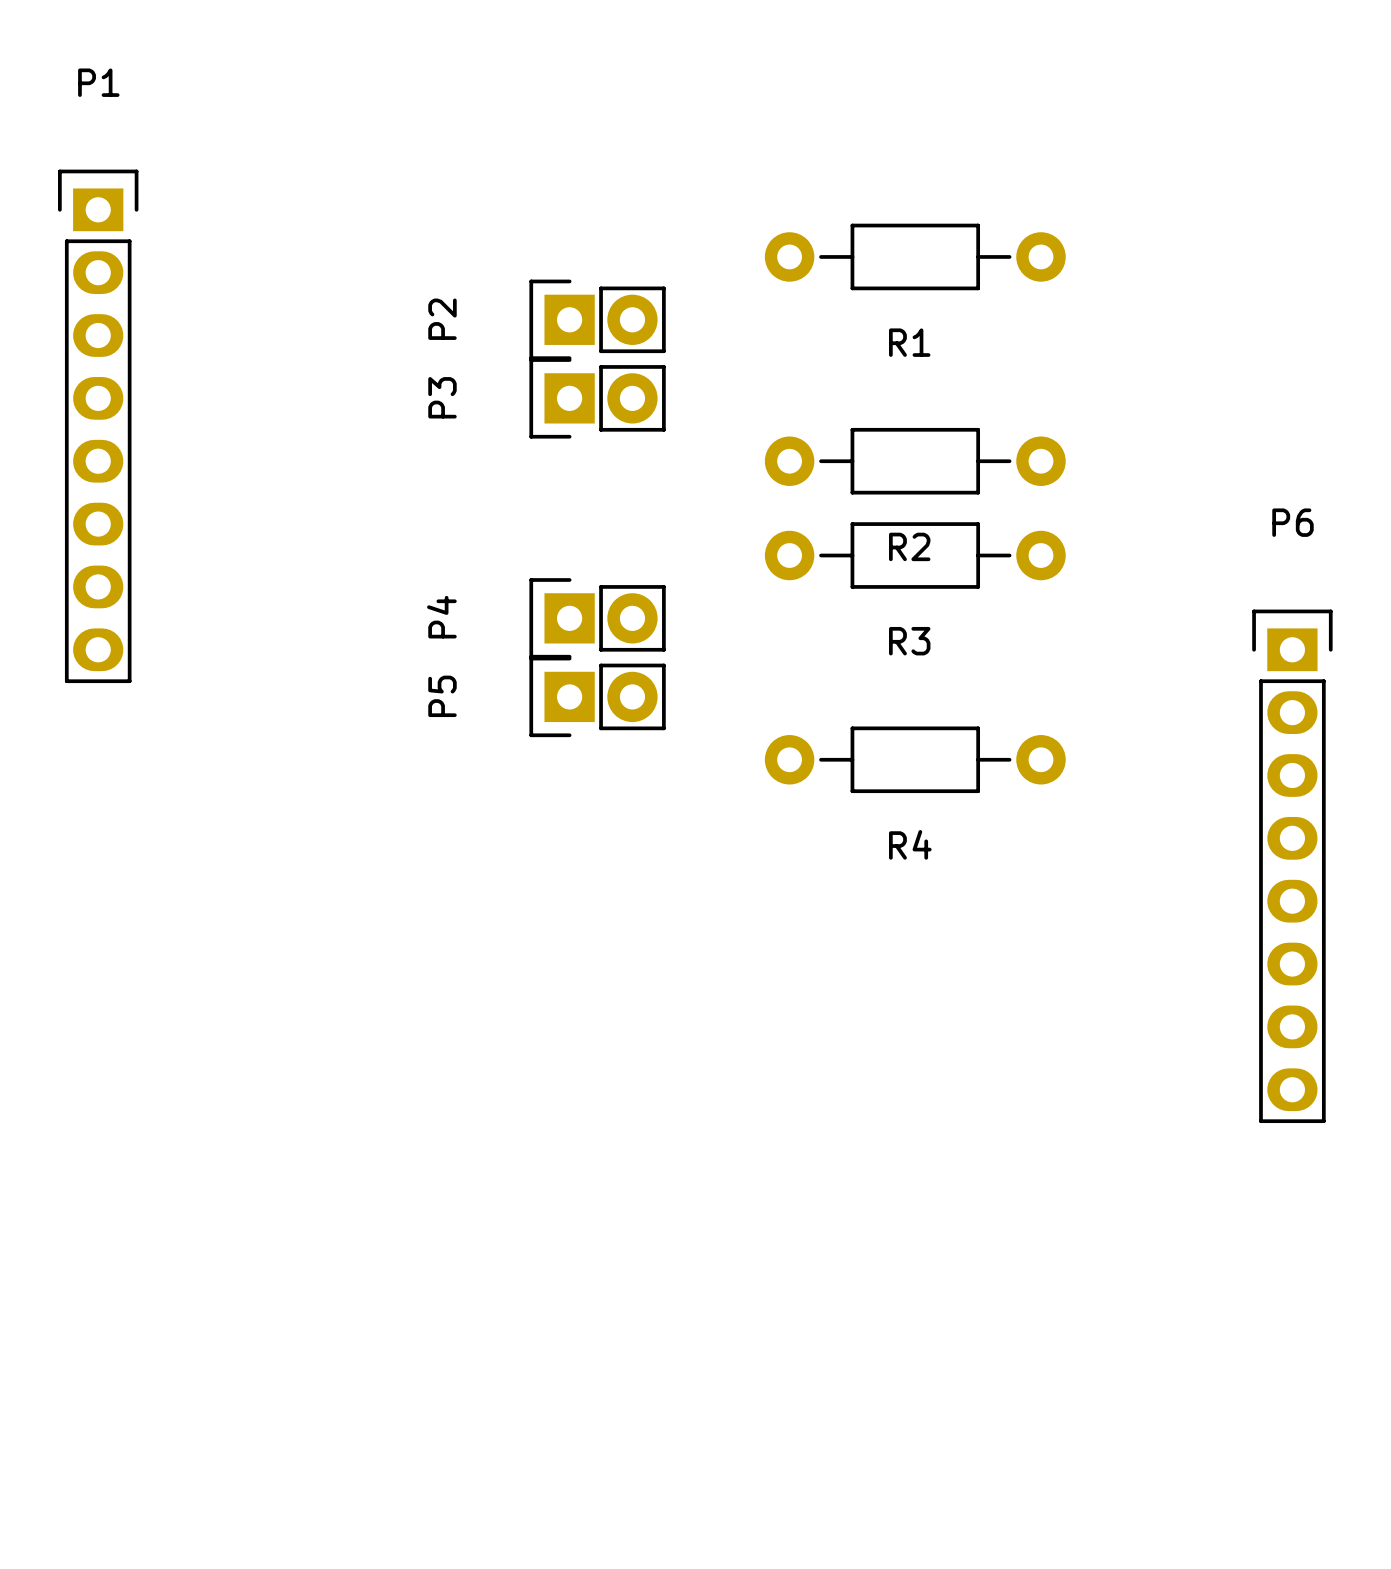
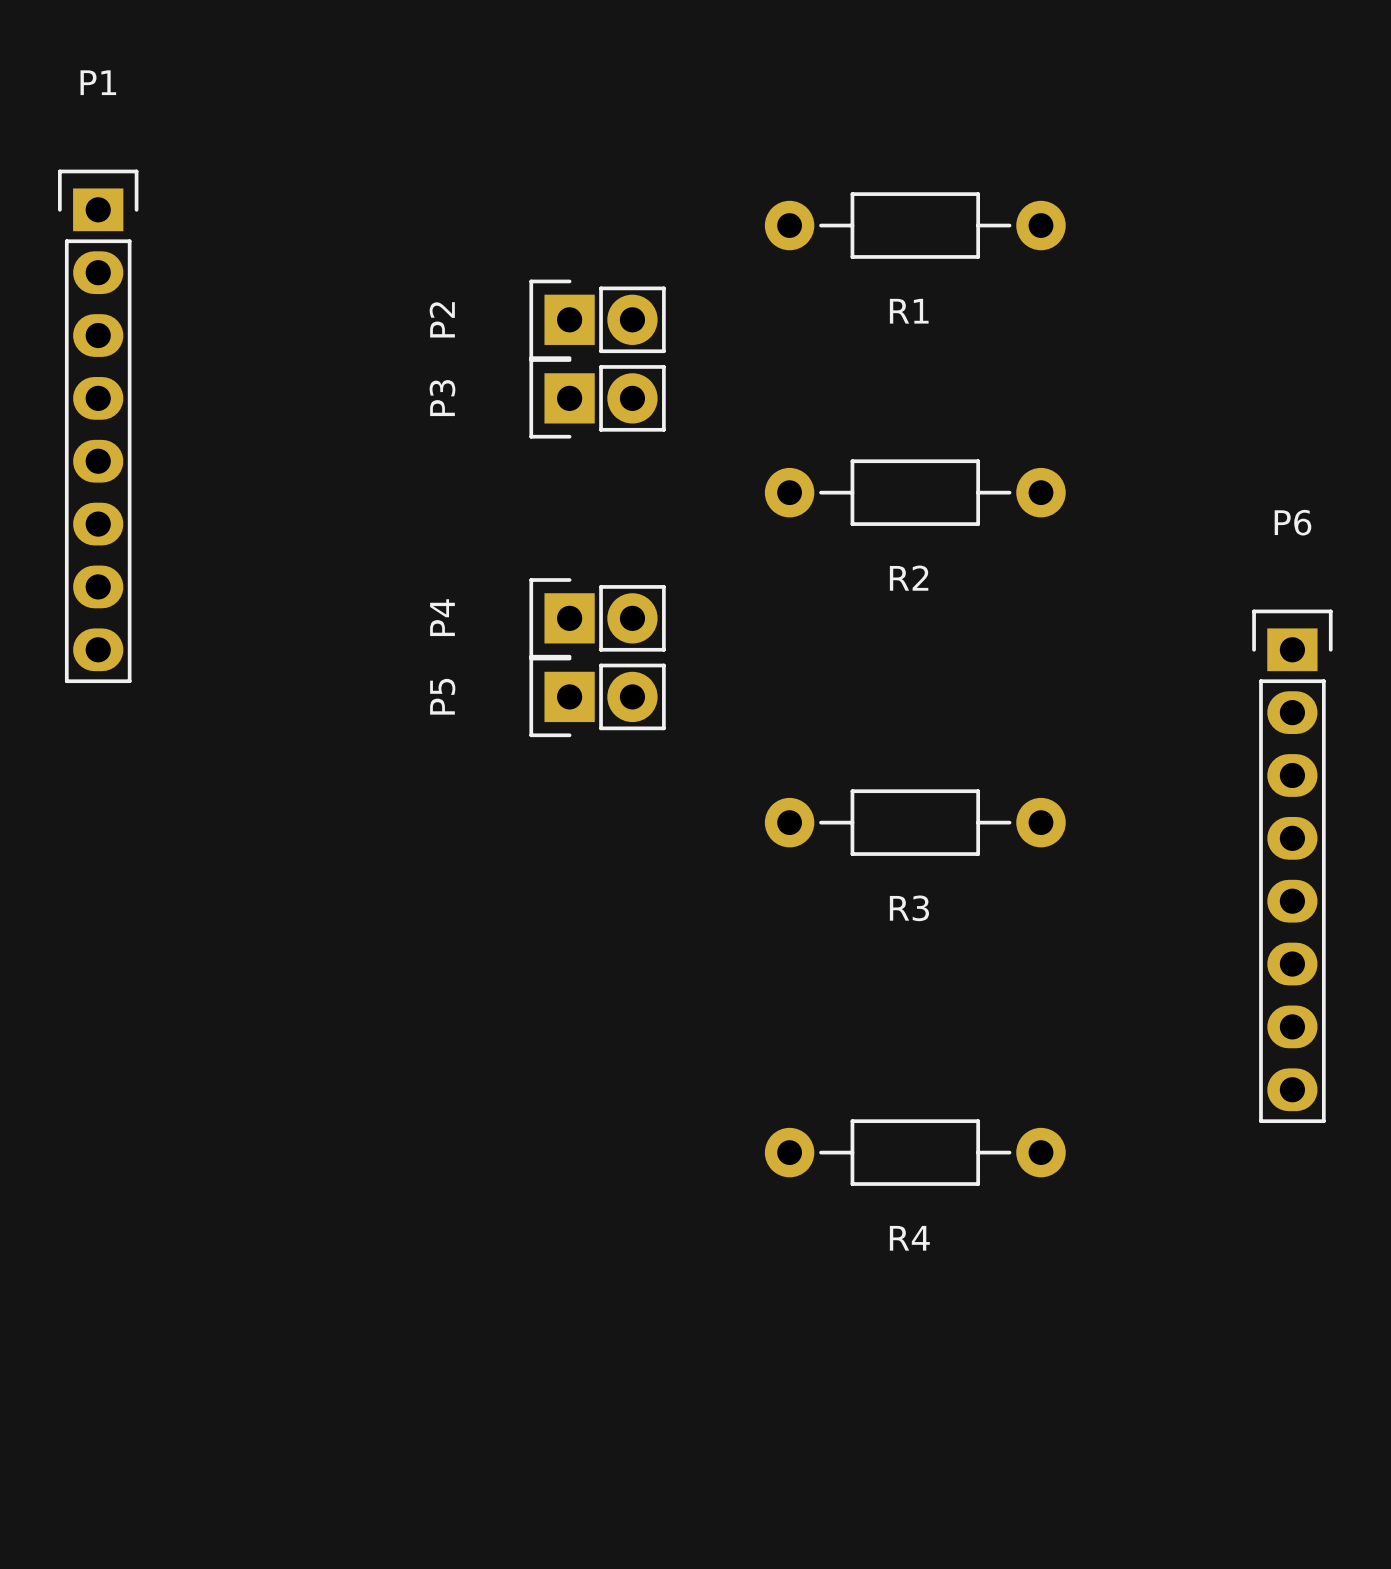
R1 position: (915, 256) -> (915, 225)
R2 position: (915, 461) -> (915, 492)
R3 position: (915, 555) -> (915, 822)
R4 position: (915, 759) -> (915, 1152)

